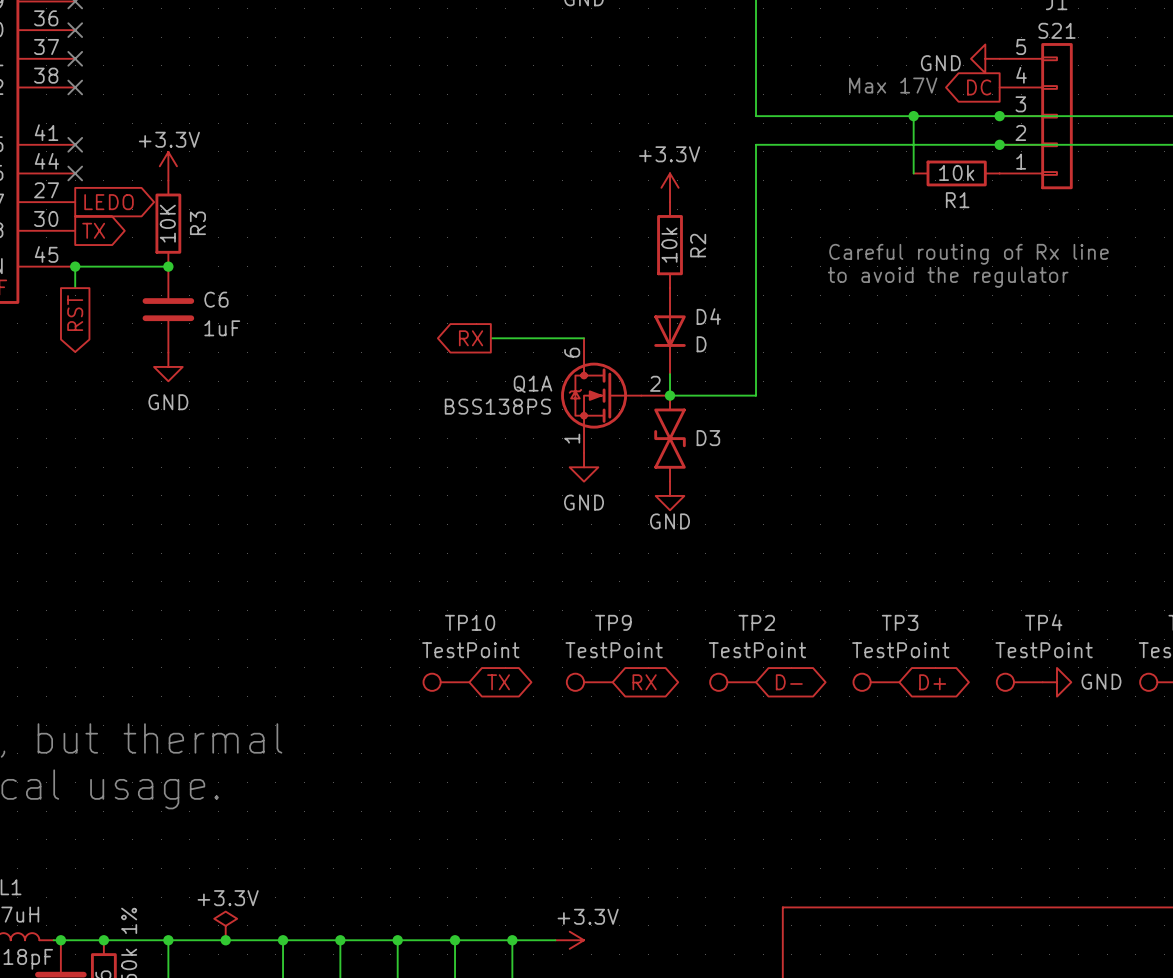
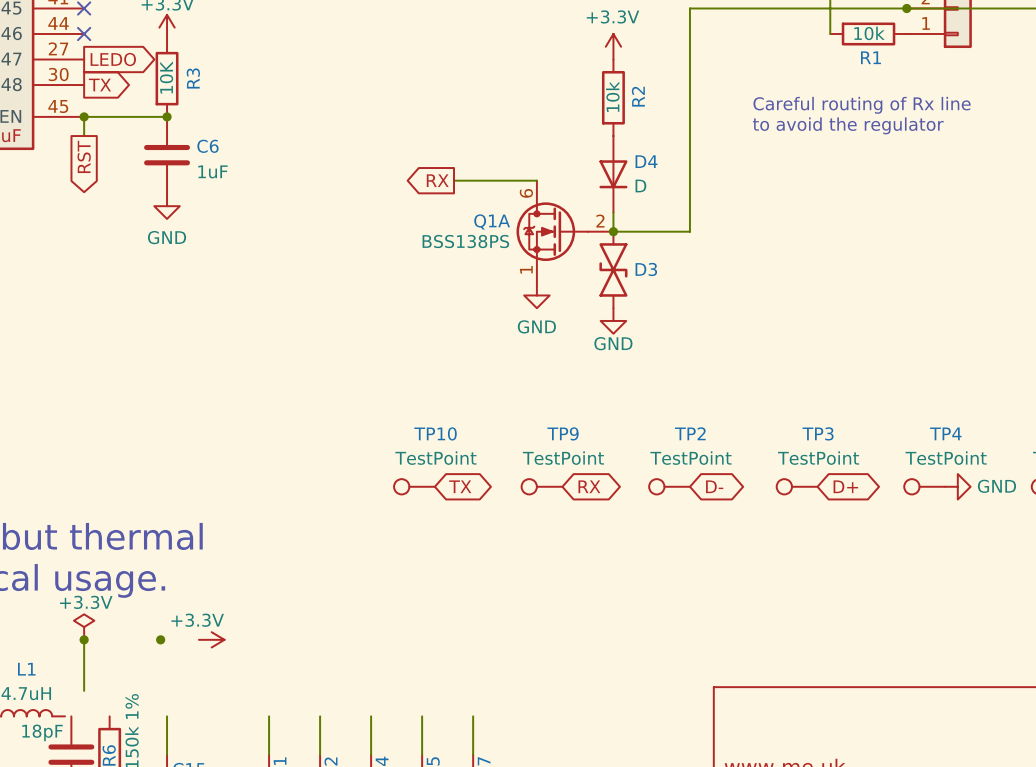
wire: none -> (84, 639) (84, 690)
junction: none -> (84, 639)
junction: none -> (160, 639)
power symbol: none -> +3.3V (211, 639)
power symbol position: +3.3V (225, 925) -> +3.3V (84, 627)
wire: (53, 940) (555, 940) -> none
junction: (60, 940) -> none
junction: (103, 940) -> none
junction: (168, 940) -> none
junction: (225, 940) -> none
junction: (283, 940) -> none
junction: (340, 940) -> none
junction: (397, 940) -> none
junction: (455, 940) -> none
junction: (512, 940) -> none
power symbol: +3.3V (569, 940) -> none

